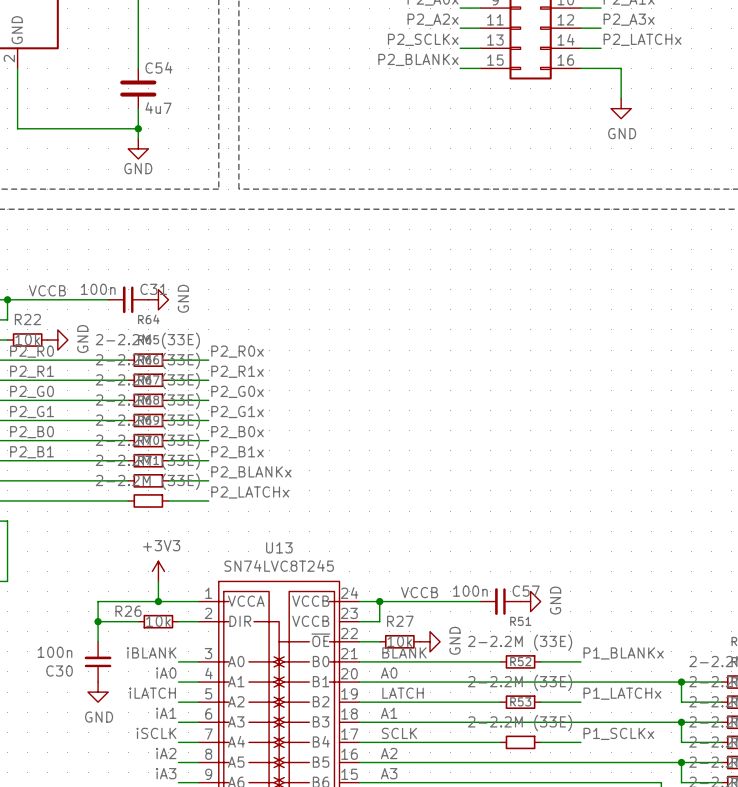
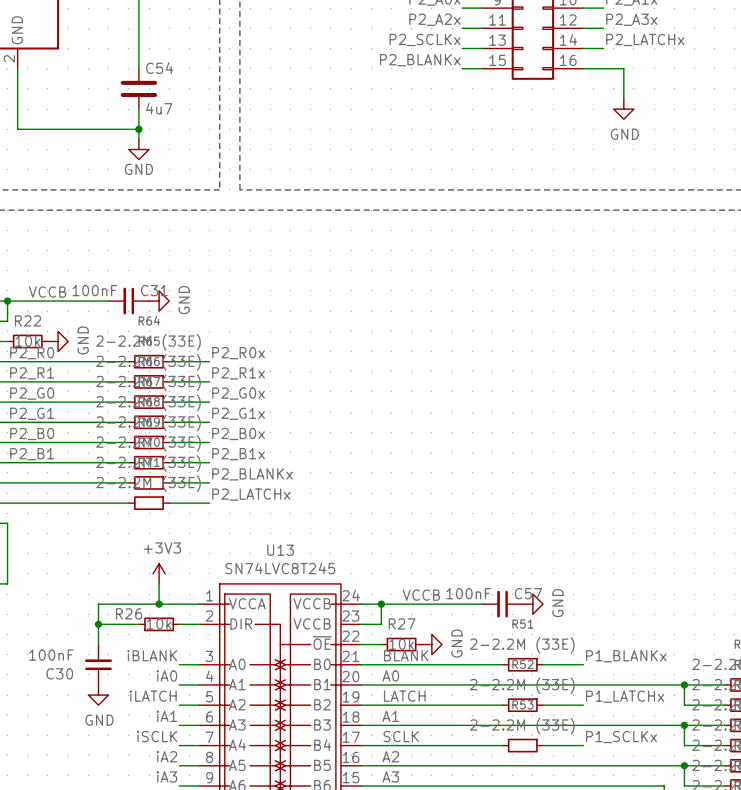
C31 value: 100n (98, 289) -> 100nF (94, 290)
C57 value: 100n (470, 591) -> 100nF (468, 593)
C30 value: 100n (54, 652) -> 100nF (51, 655)

